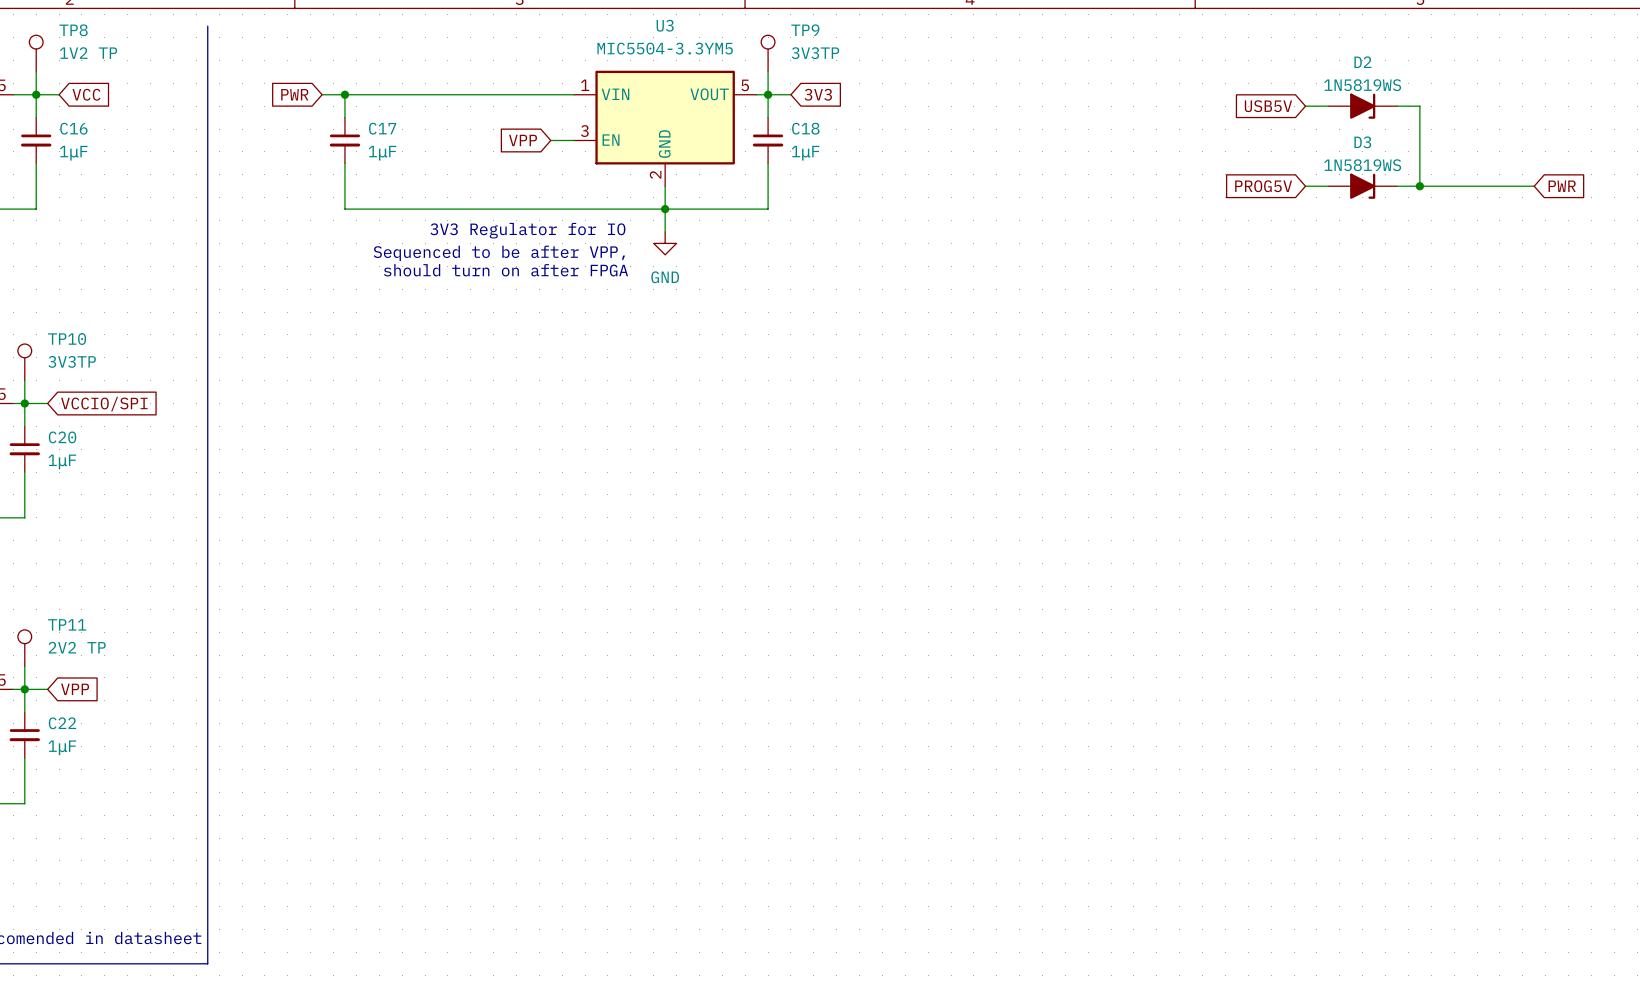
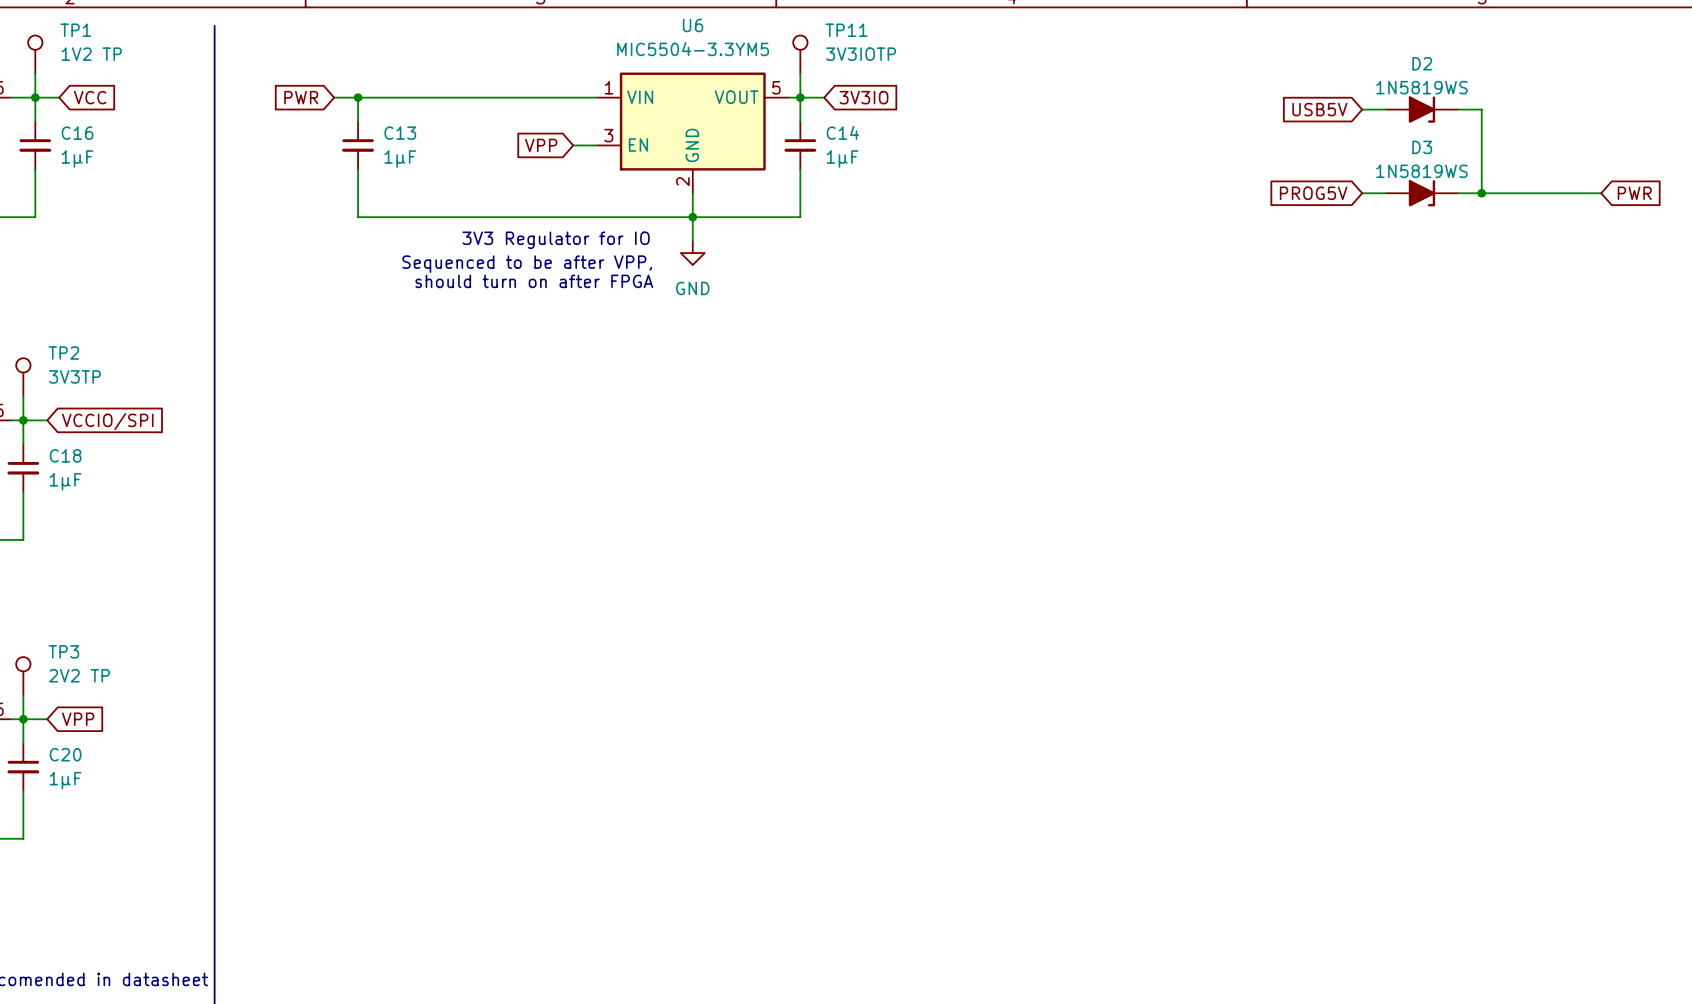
U3 name: U3 (665, 25) -> U6 (693, 25)
TP8 name: TP8 (73, 30) -> TP1 (75, 30)
TP9 name: TP9 (805, 30) -> TP11 (846, 30)
TP9 value: 3V3TP (815, 53) -> 3V3IOTP (861, 54)
global label: 3V3 (818, 94) -> 3V3IO (863, 97)
C17 name: C17 (382, 128) -> C13 (400, 133)
C18 name: C18 (805, 128) -> C14 (842, 132)
TP10 name: TP10 (67, 339) -> TP2 (63, 353)
C20 name: C20 (62, 437) -> C18 (65, 455)
TP11 name: TP11 (67, 624) -> TP3 (63, 651)
C22 name: C22 (62, 723) -> C20 (65, 754)

